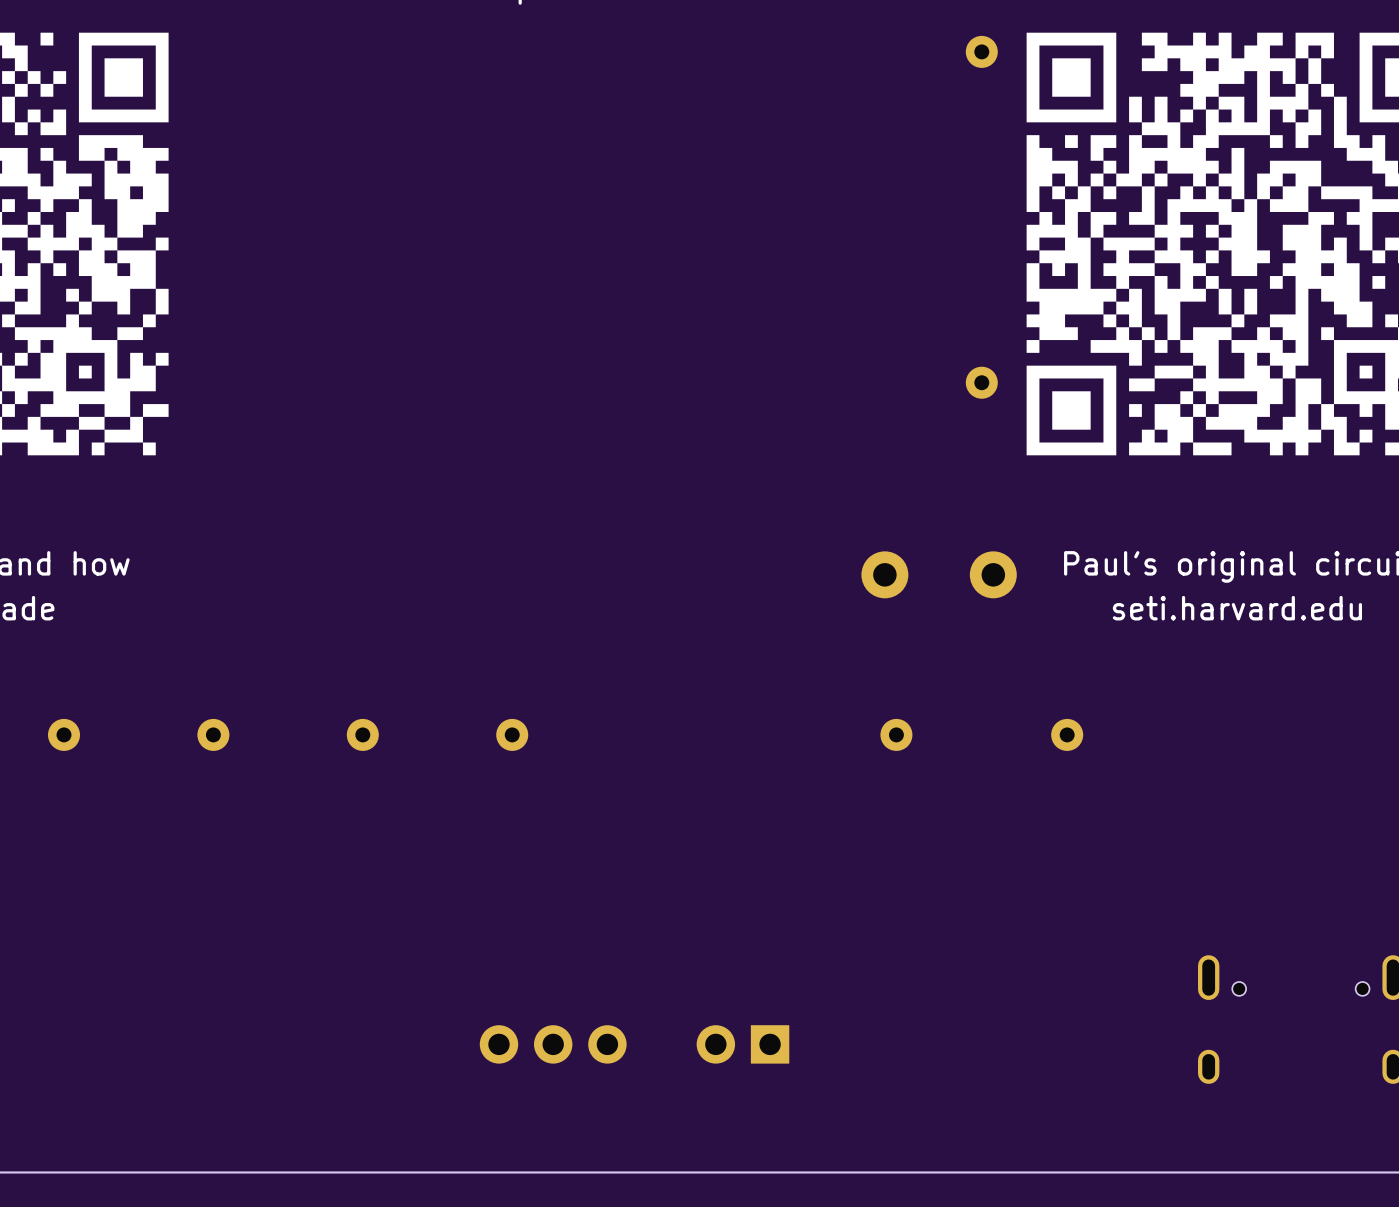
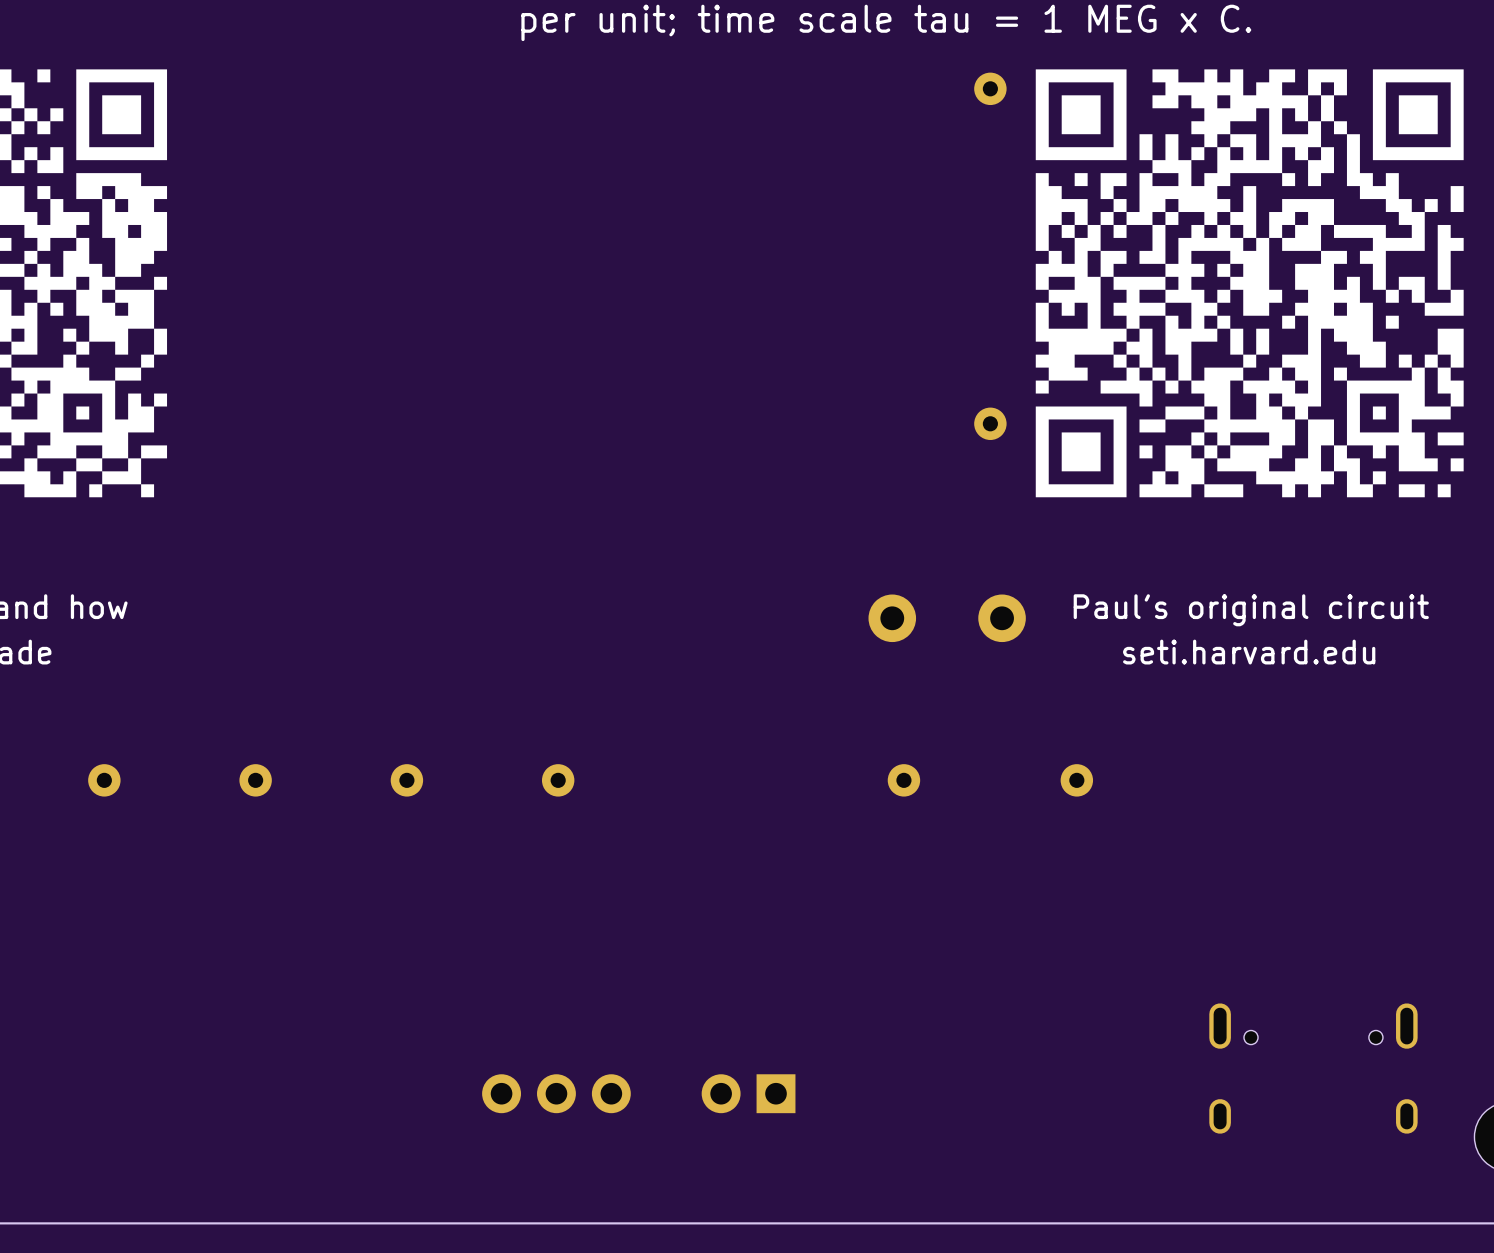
part position: (64, 734) -> (104, 780)
part position: (213, 734) -> (255, 780)
part position: (362, 734) -> (406, 780)
part position: (512, 734) -> (558, 780)

